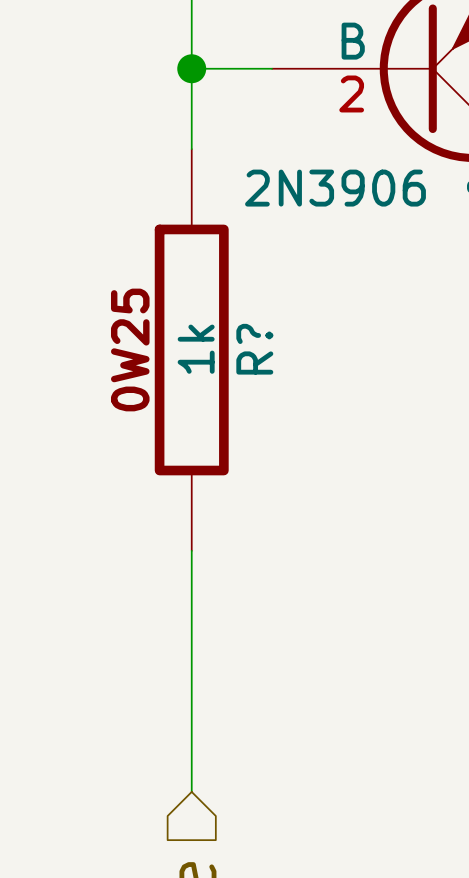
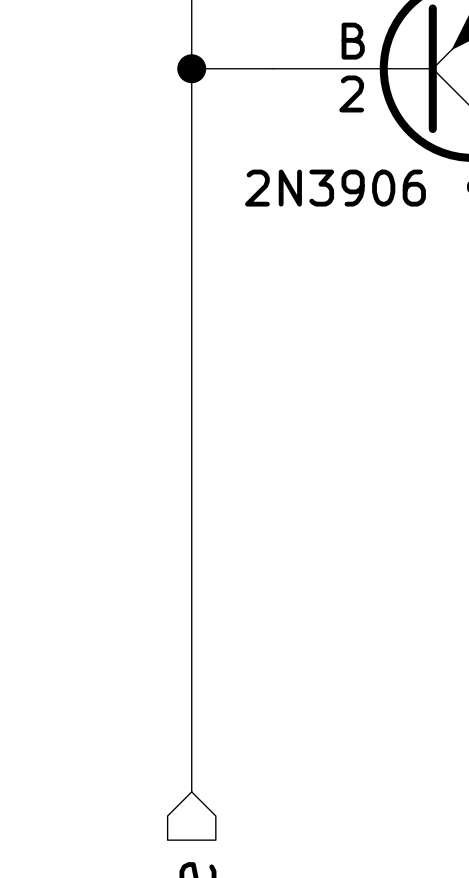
wire: none -> (191, 149) (191, 550)
R?: 1k (191, 349) -> none

